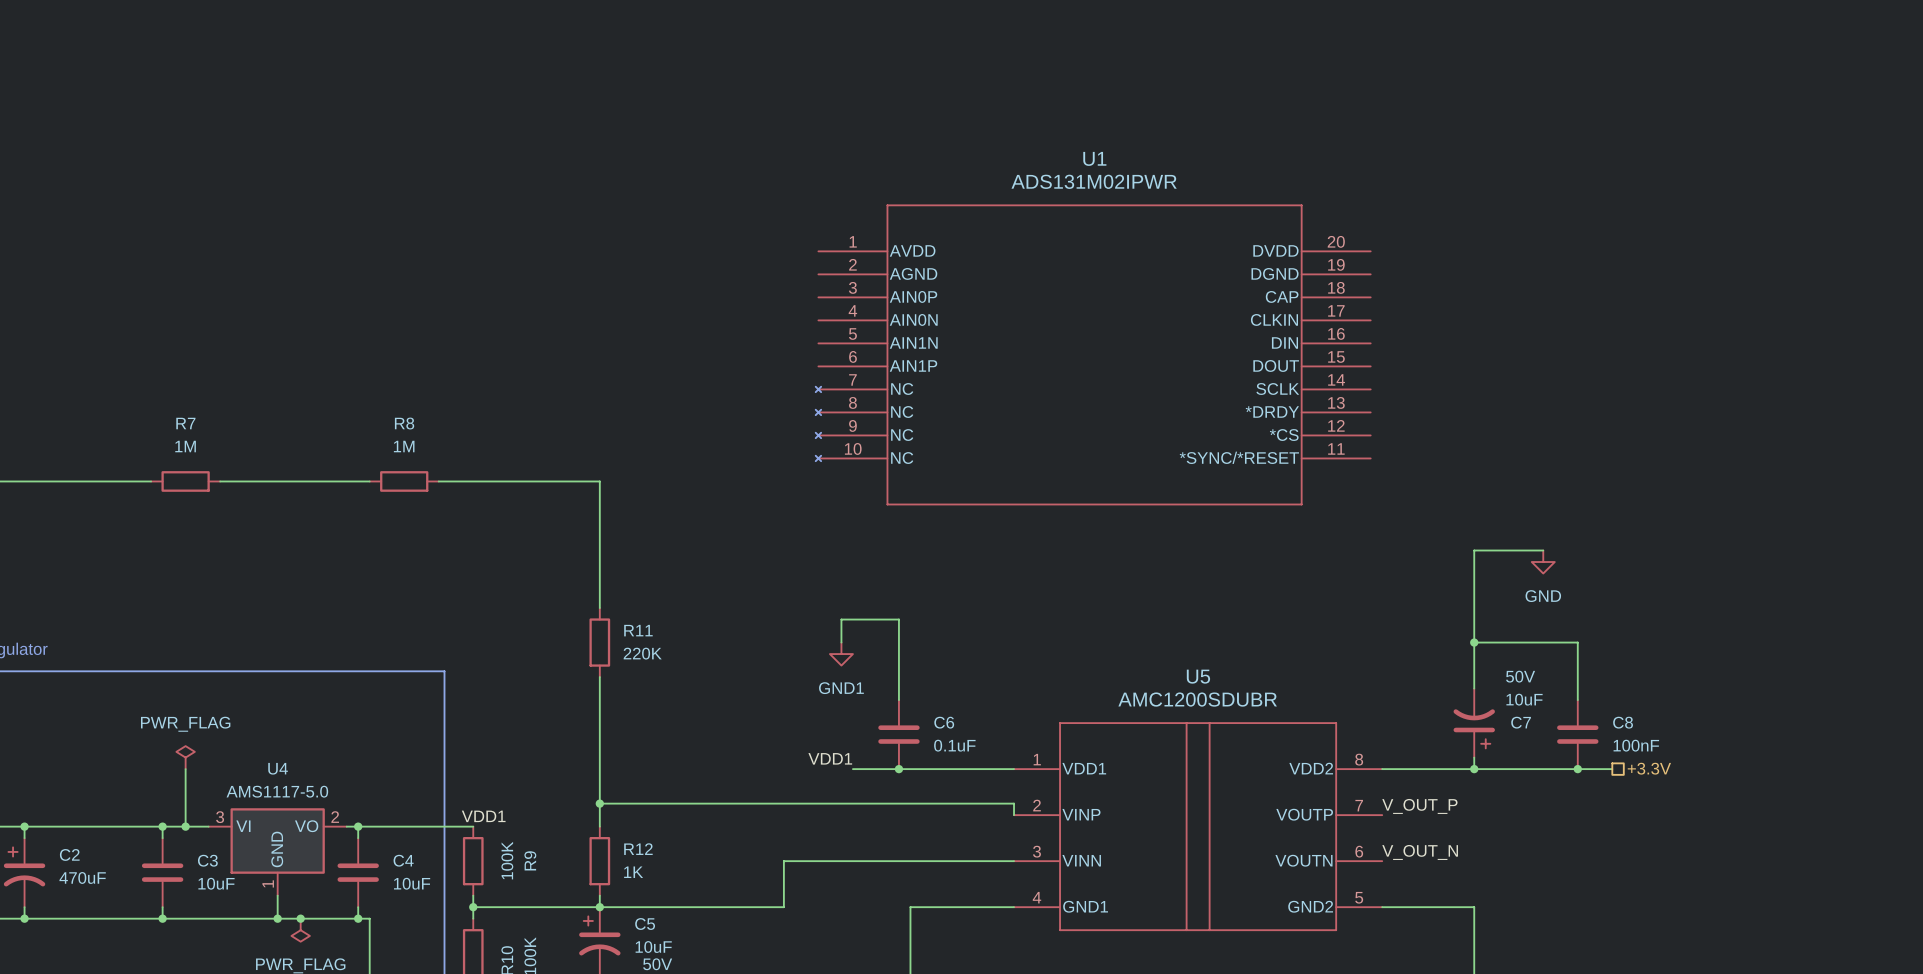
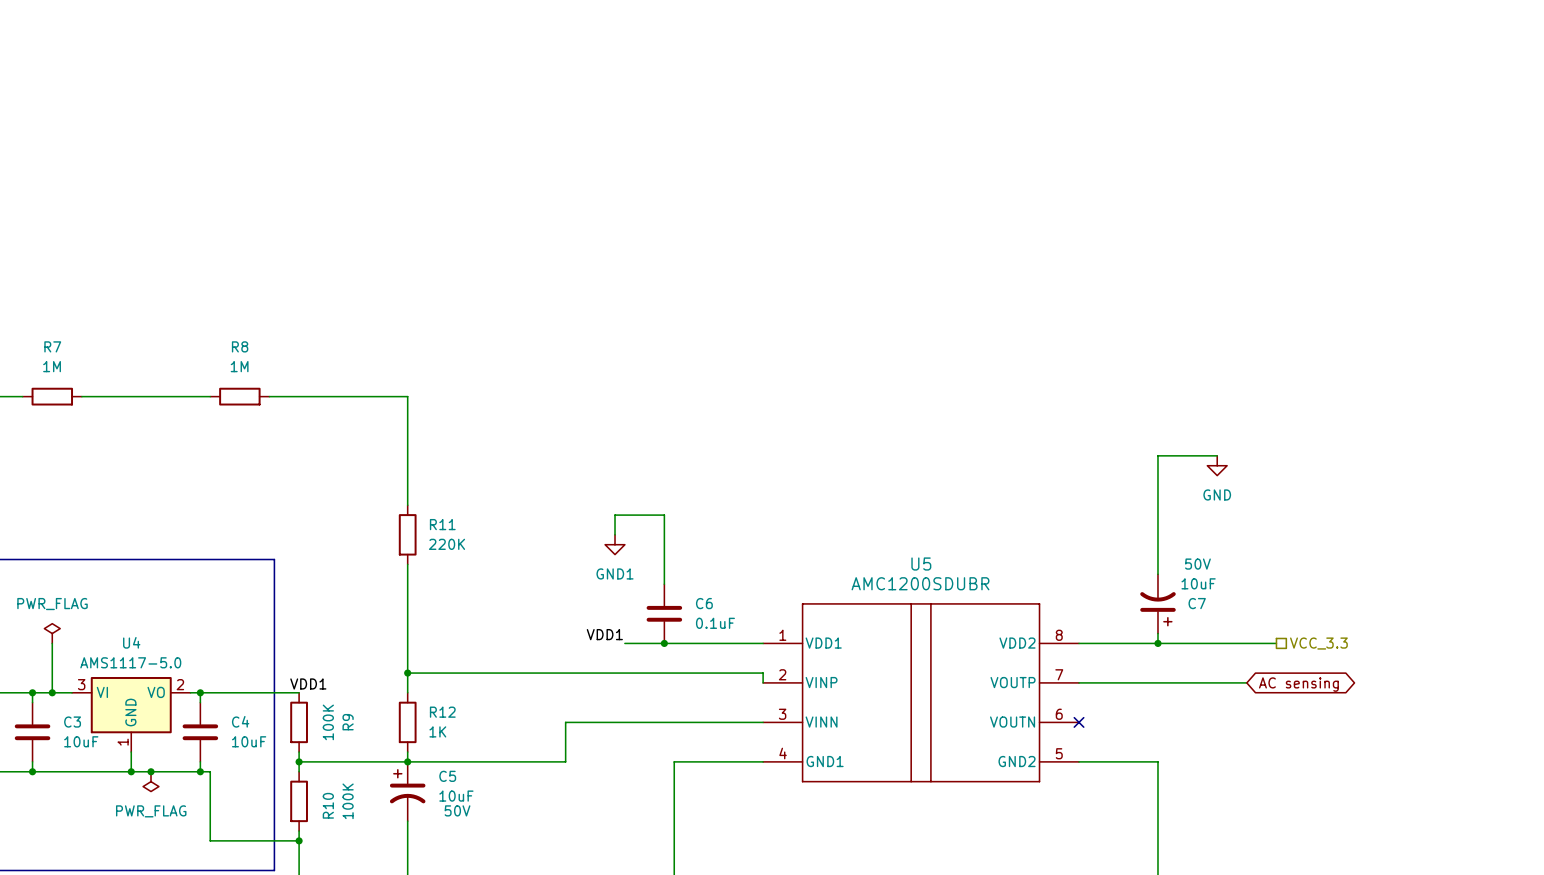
U1: ADS131M02IPWR (1093, 354) -> none
wire: (1474, 642) (1577, 642) (1577, 700) -> none
junction: (1474, 642) -> none
C8: 100nF (1577, 734) -> none
hierarchical label: +3.3V (1649, 768) -> VCC_3.3 (1318, 643)
junction: (1577, 769) -> none
label: V_OUT_P (1419, 806) -> none
wire: none -> (1079, 682) (1246, 682)
global label: none -> AC sensing (1298, 684)
label: V_OUT_N (1420, 852) -> none
no-connect mark: none -> (1079, 722)

